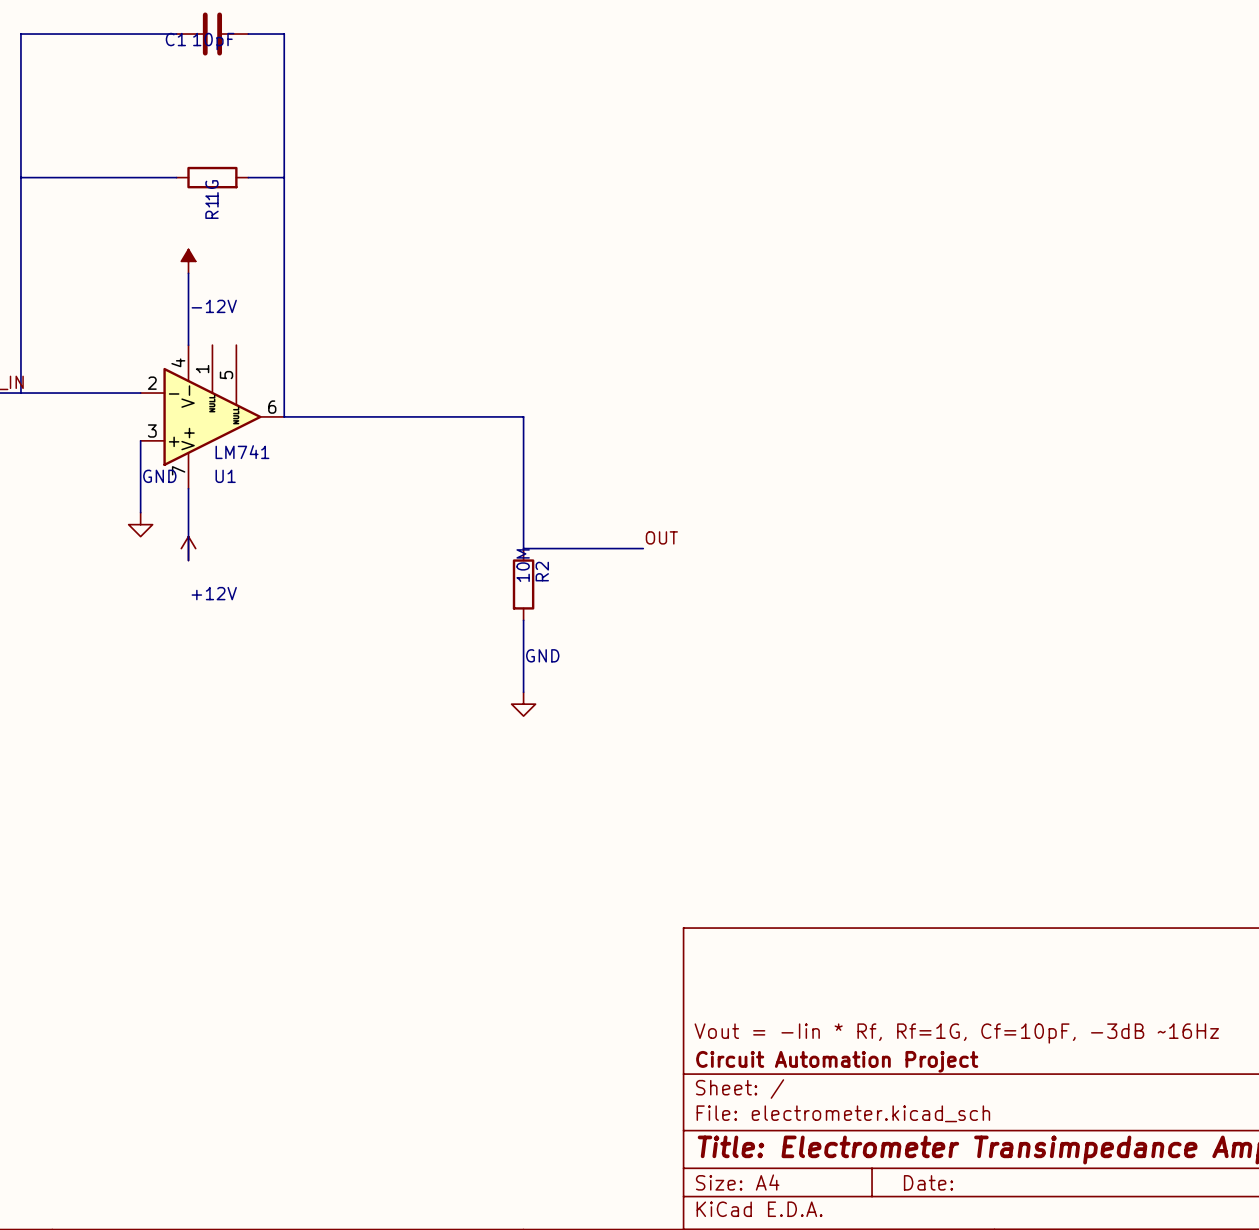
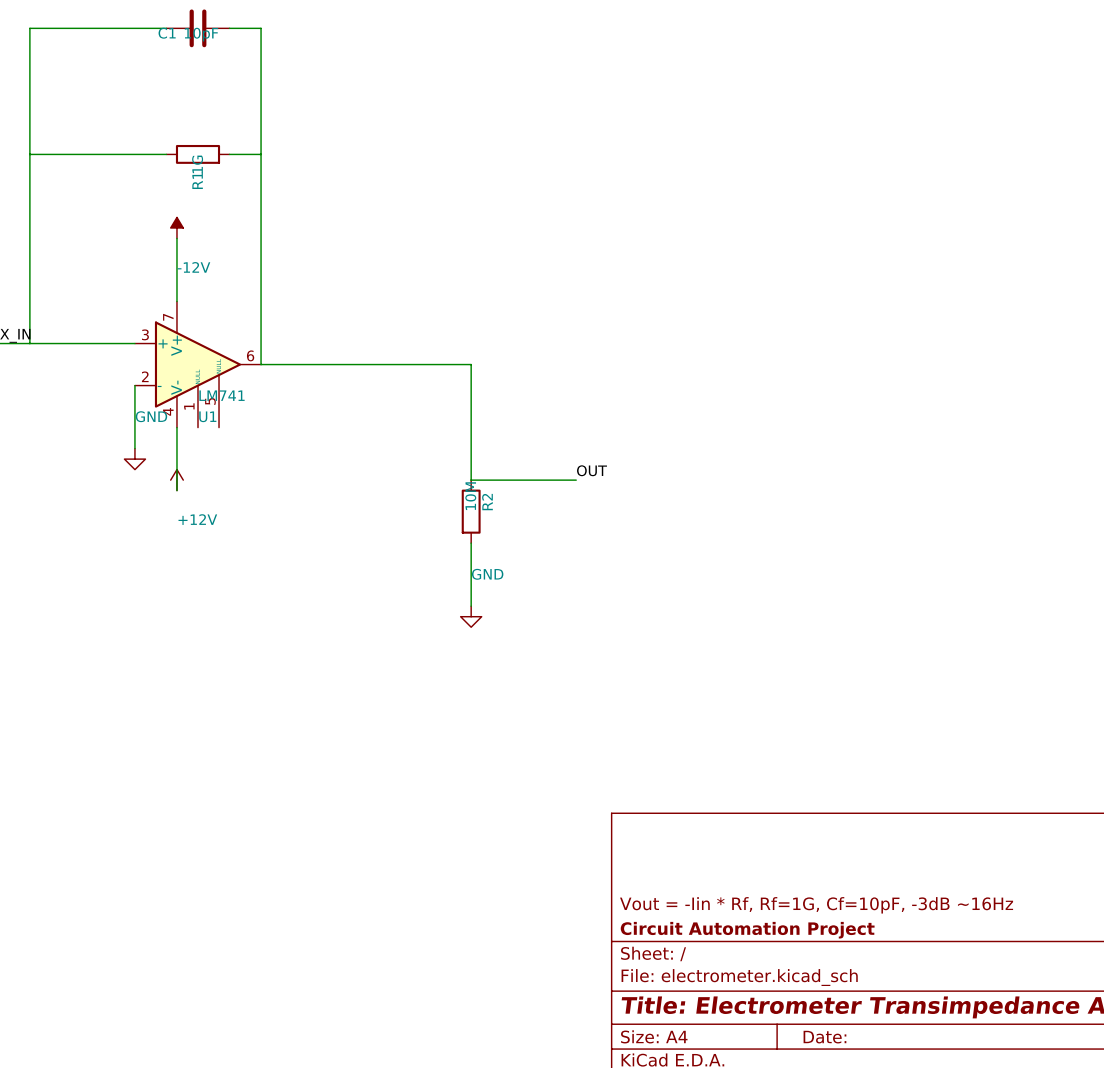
U1 flip: as is (212, 416) -> up-down (198, 364)

